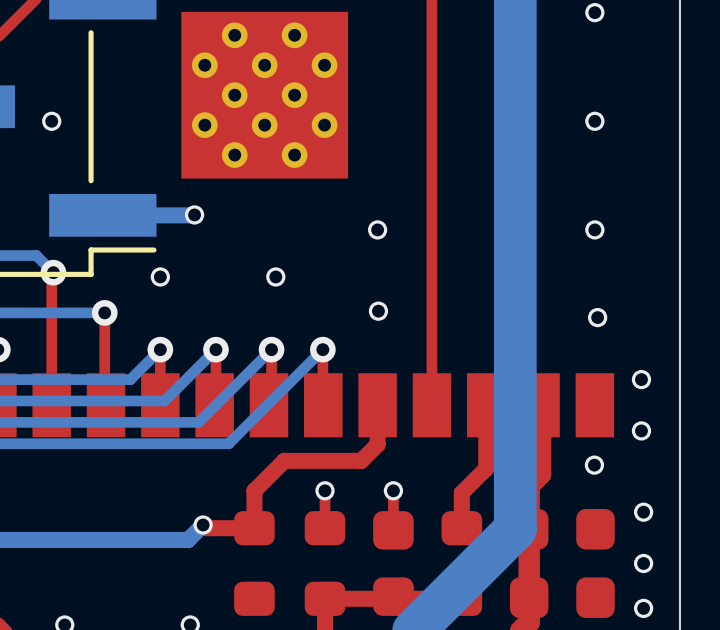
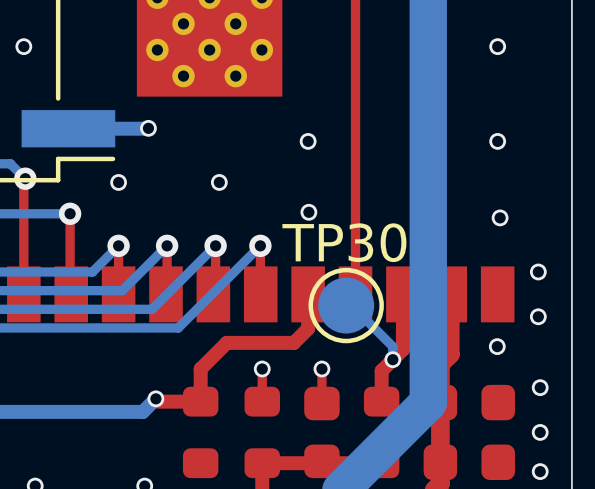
bottom track: none -> (346, 305) (351, 305) (392, 346) (392, 359)
TP30: none -> (346, 305)
via: none -> (392, 359)

